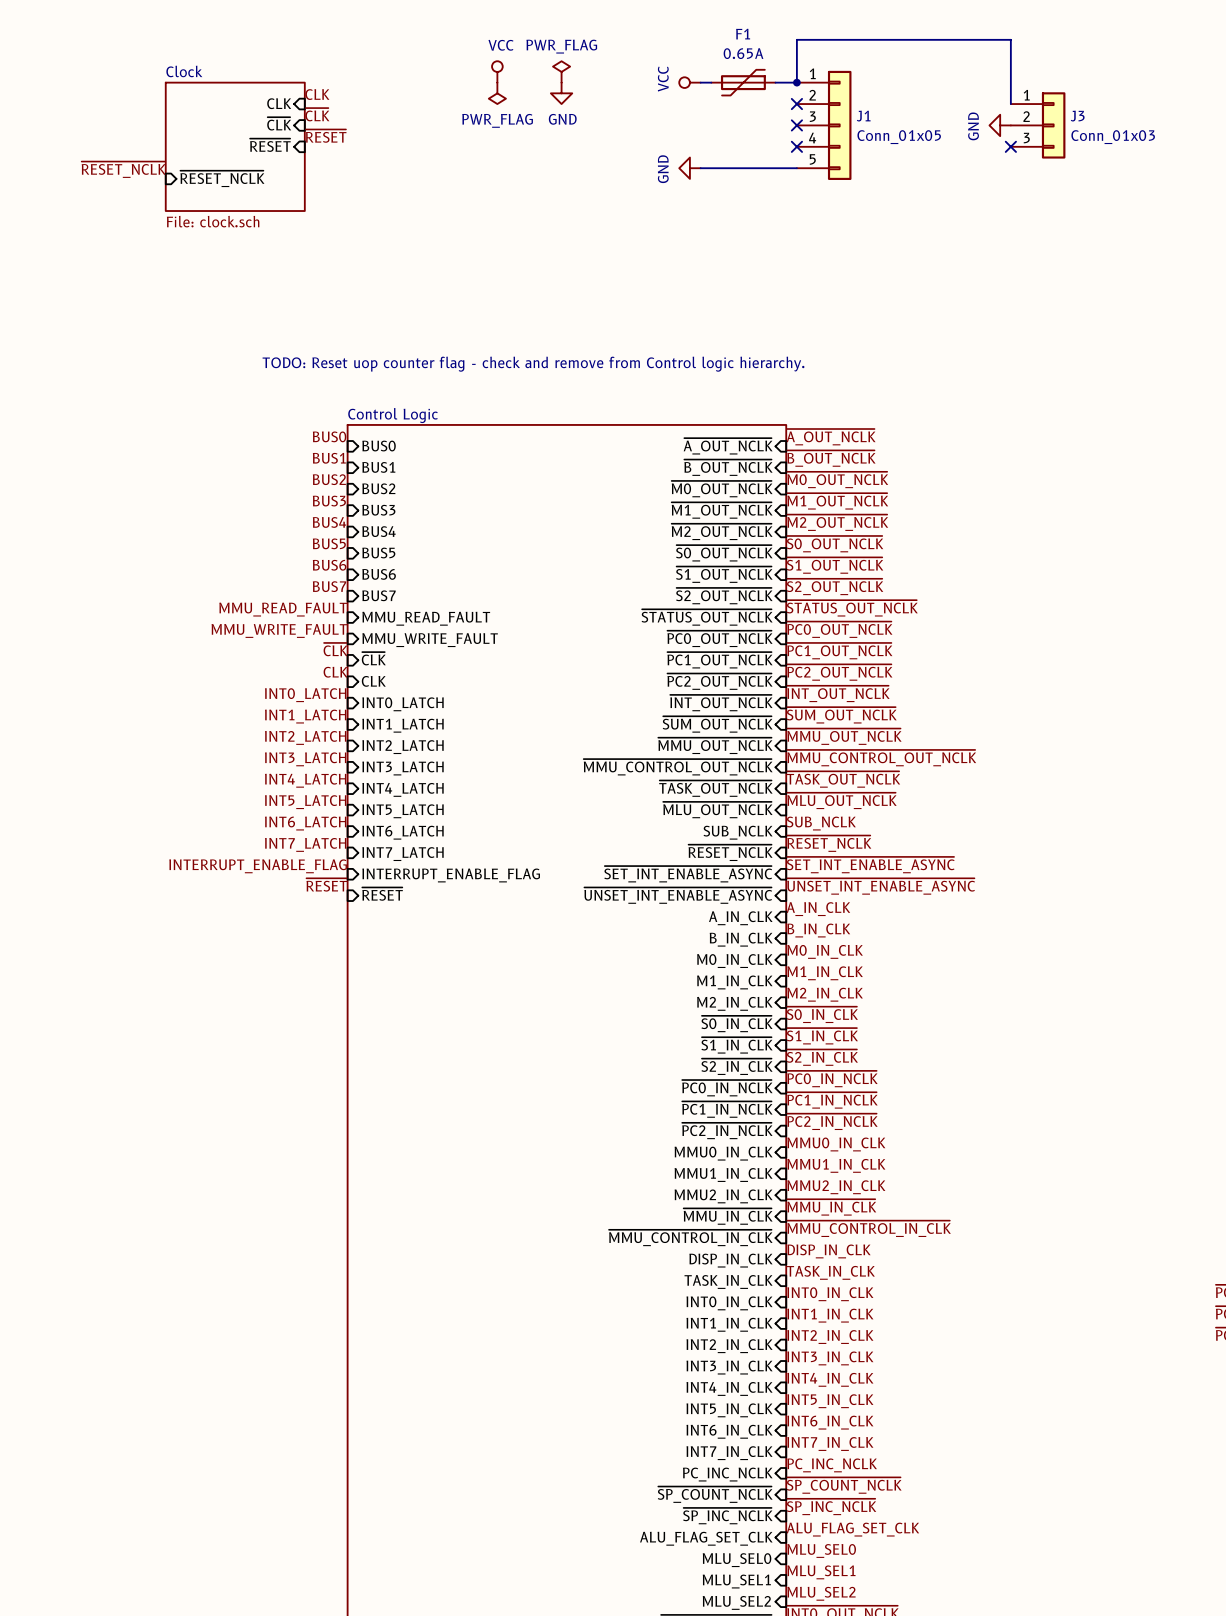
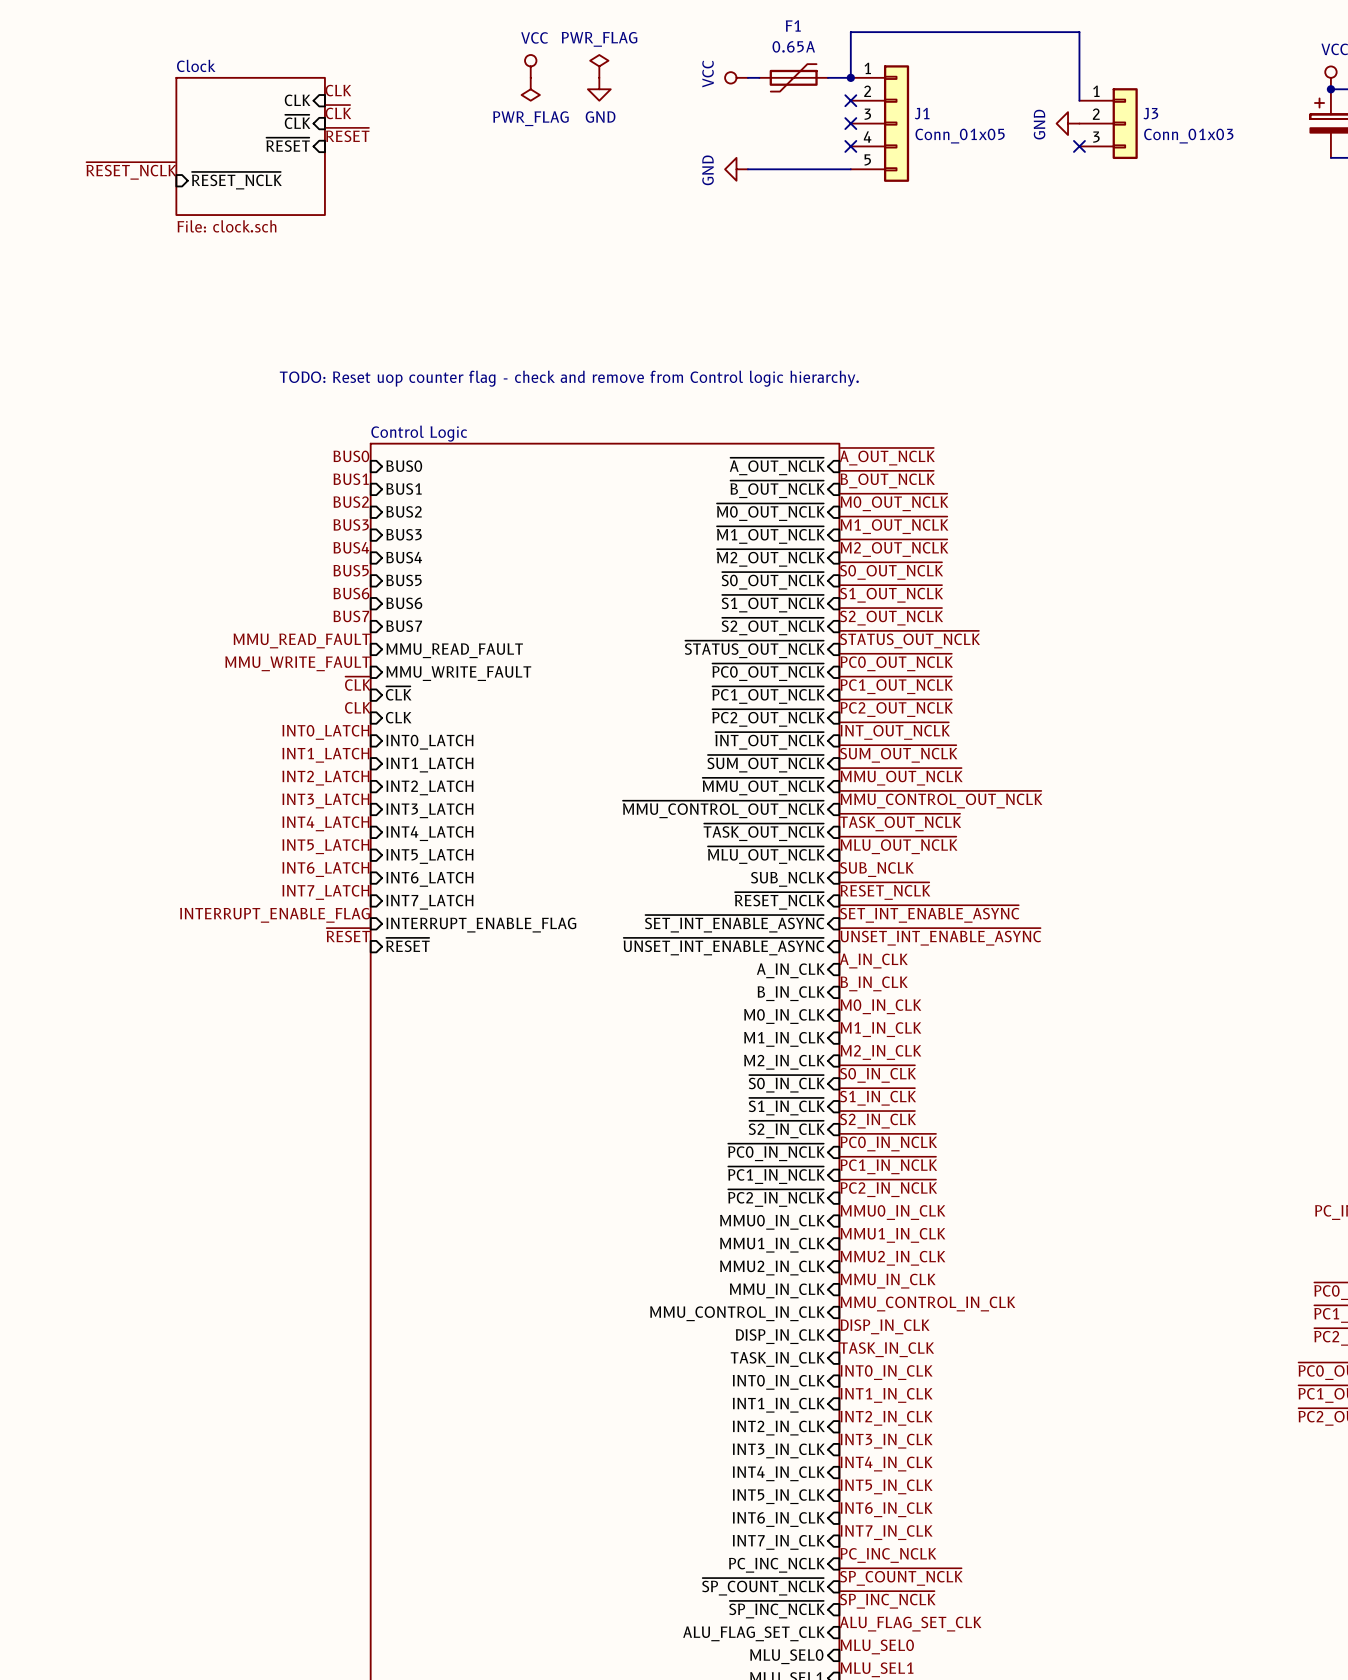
label: ~{MMU_IN_CLK} (831, 1207) -> MMU_IN_CLK (888, 1281)
sheet pin: ~{MMU_IN_CLK} (728, 1216) -> MMU_IN_CLK (777, 1290)
label: ~{MMU_CONTROL_IN_CLK} (869, 1228) -> MMU_CONTROL_IN_CLK (927, 1303)
sheet pin: ~{MMU_CONTROL_IN_CLK} (690, 1237) -> MMU_CONTROL_IN_CLK (737, 1313)

